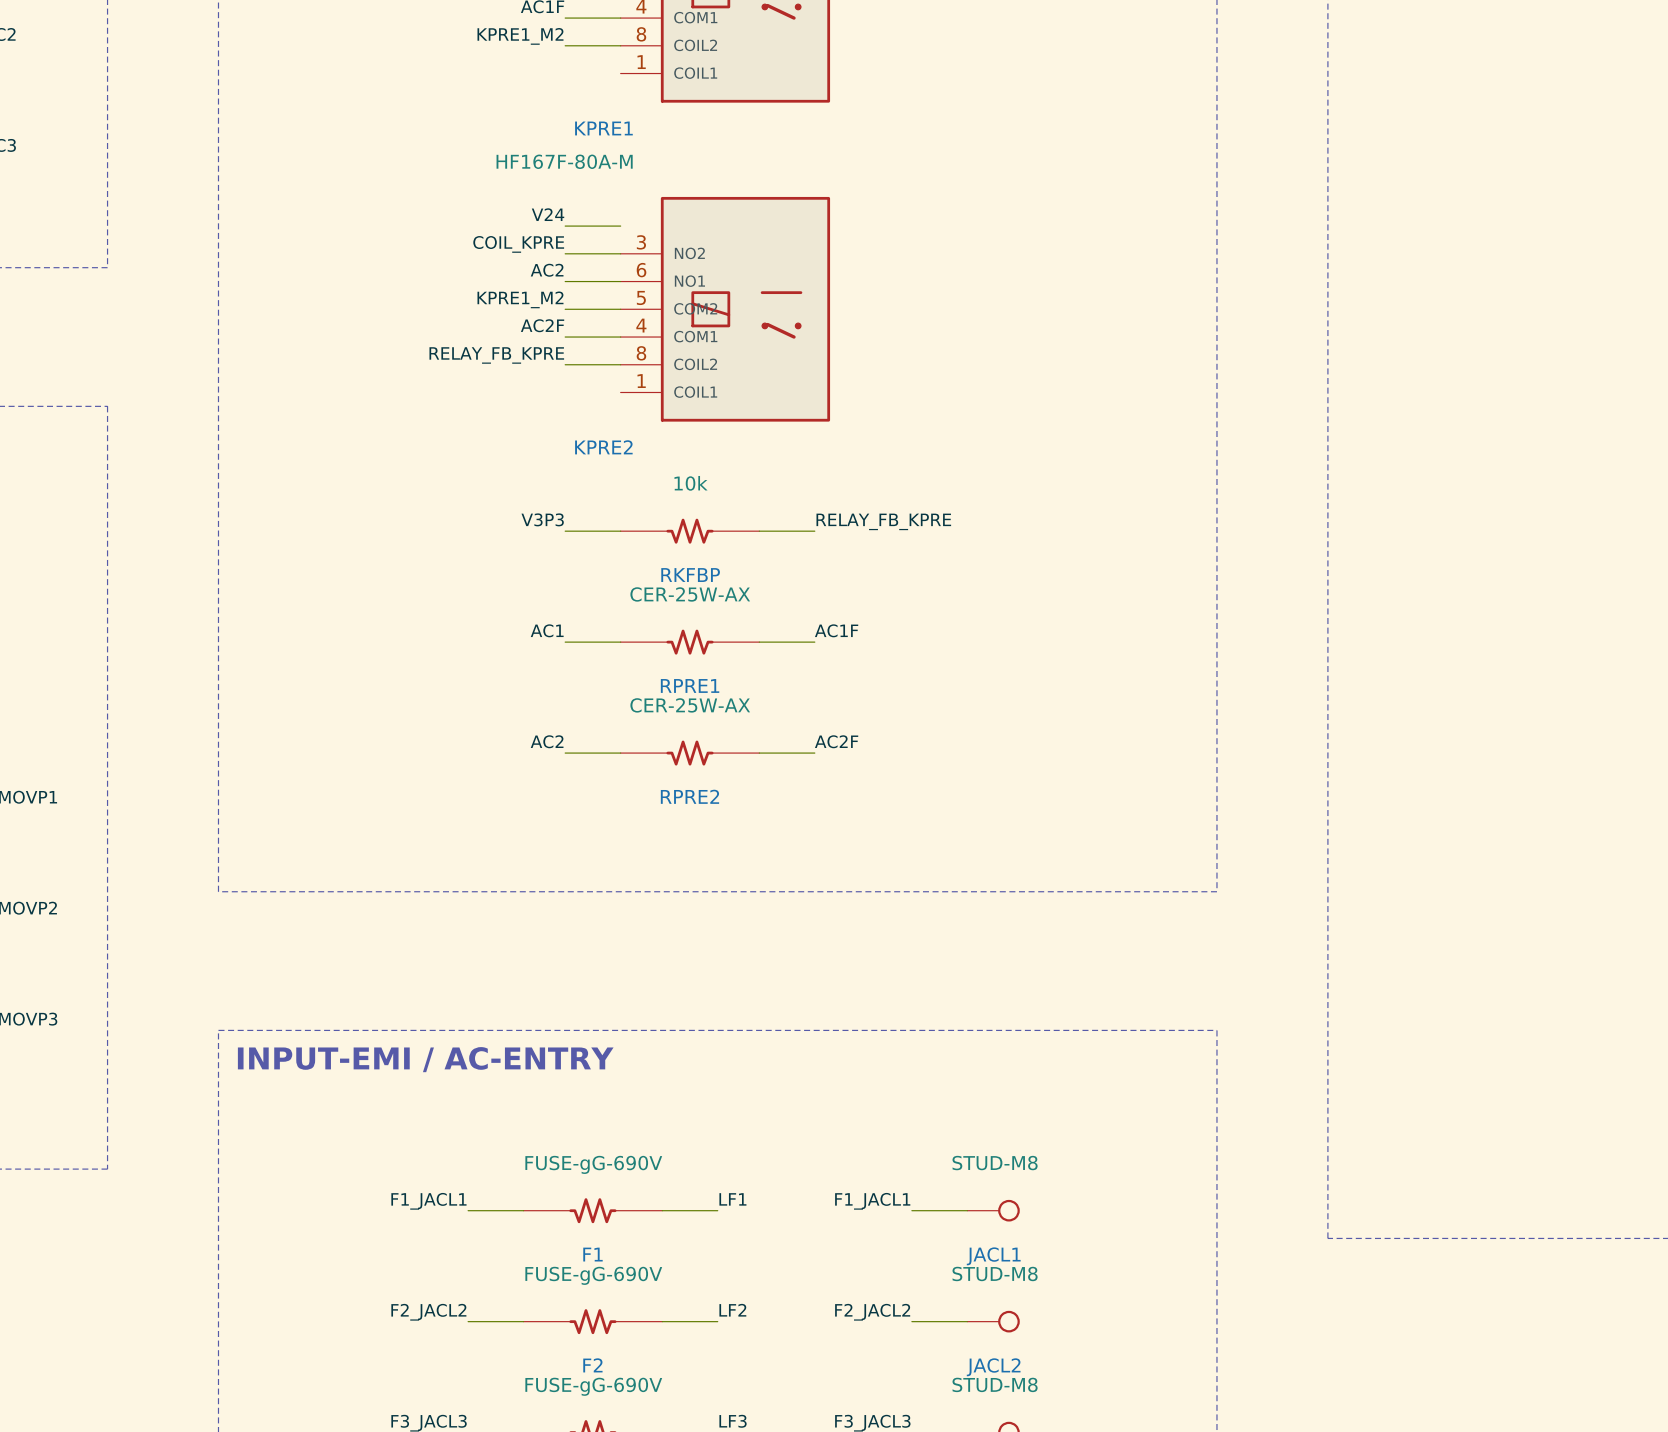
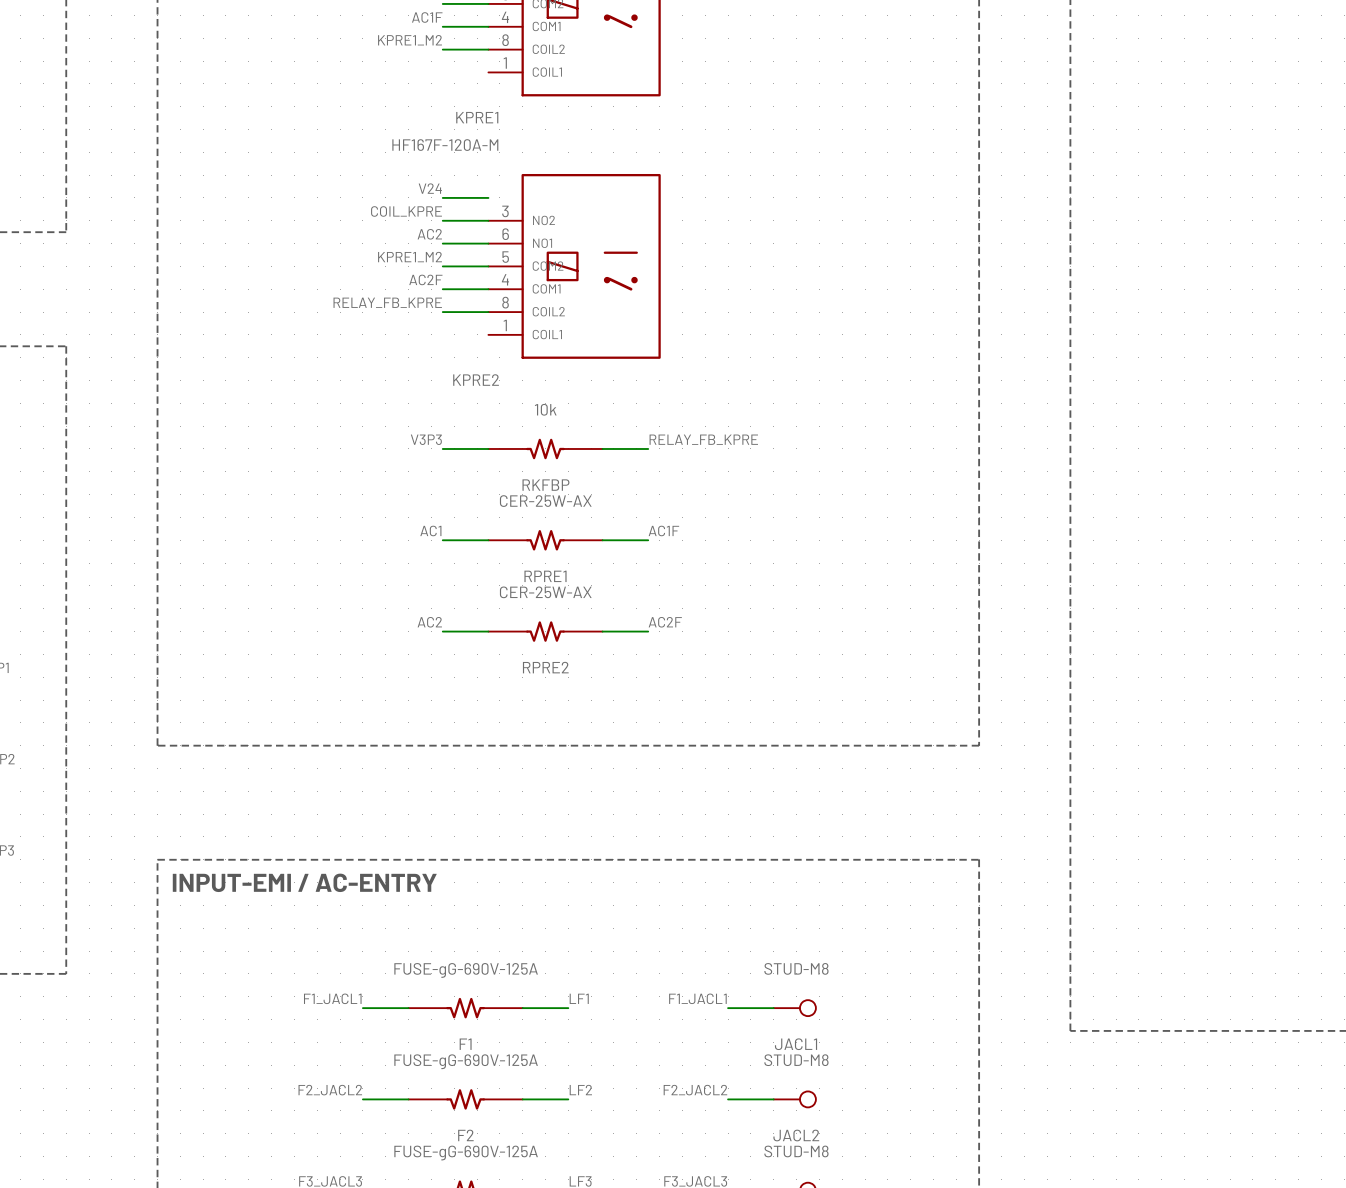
KPRE2 value: HF167F-80A-M (564, 161) -> HF167F-120A-M (445, 145)
F1 value: FUSE-gG-690V (593, 1164) -> FUSE-gG-690V-125A (466, 970)
F2 value: FUSE-gG-690V (593, 1275) -> FUSE-gG-690V-125A (466, 1061)
part value: FUSE-gG-690V (593, 1386) -> FUSE-gG-690V-125A (466, 1153)

